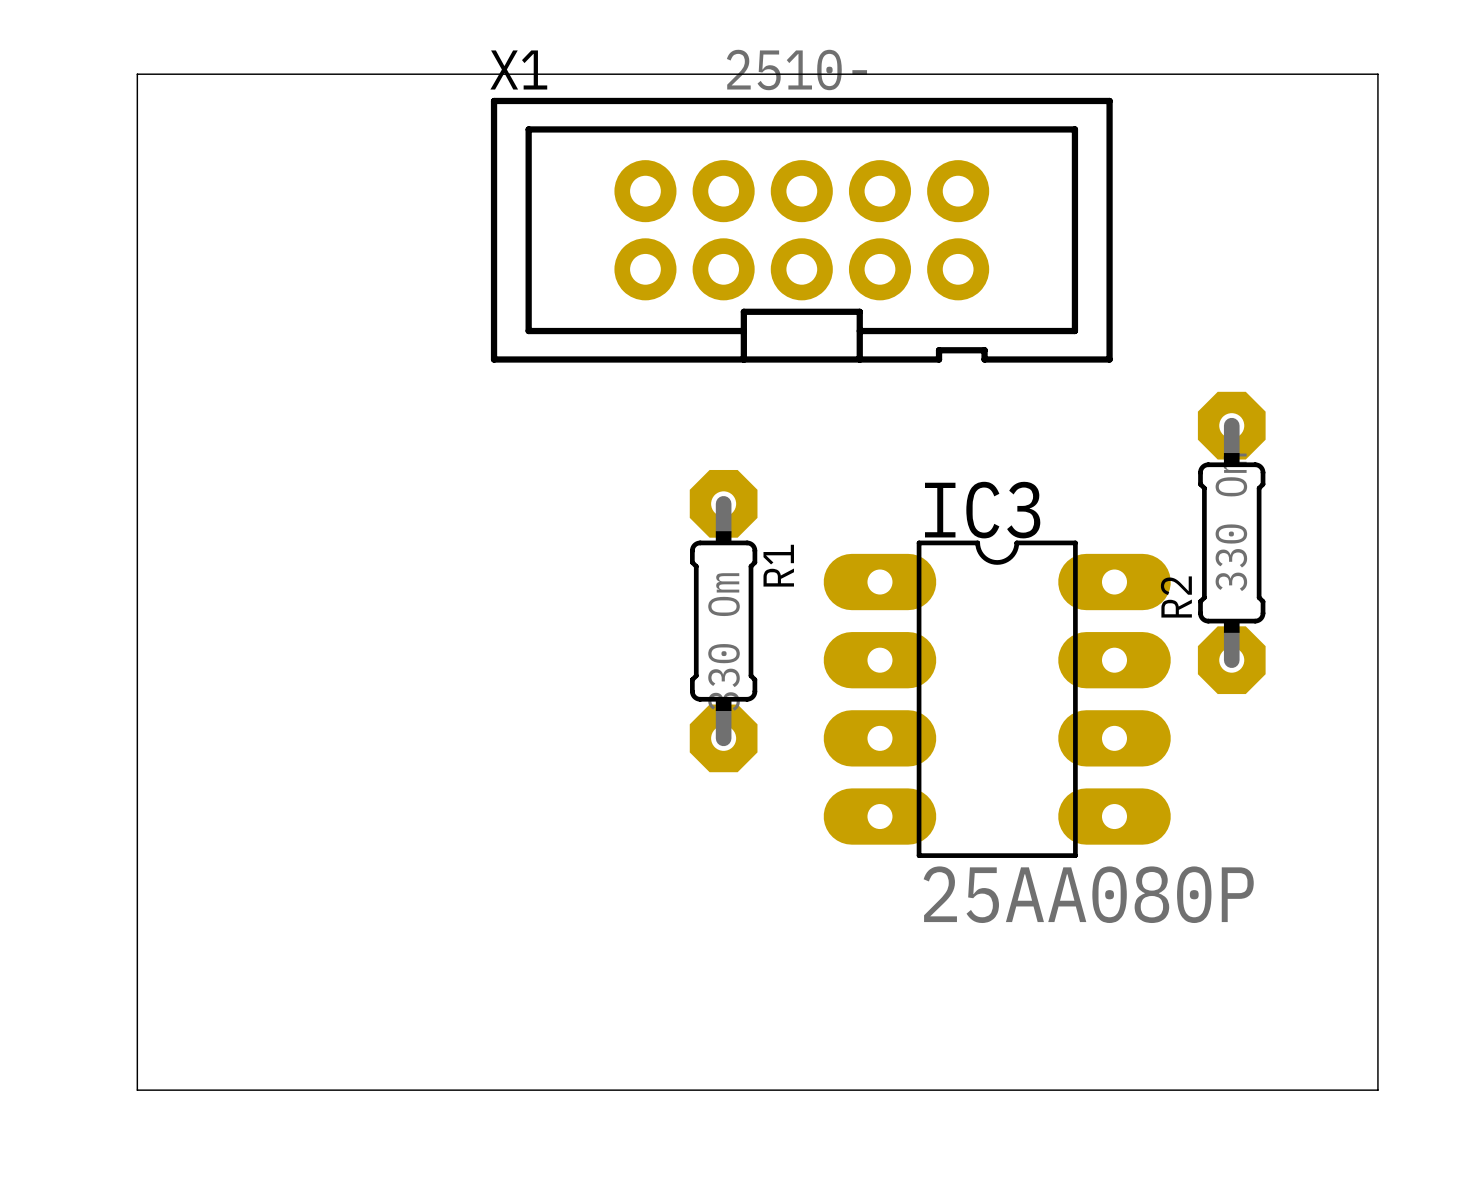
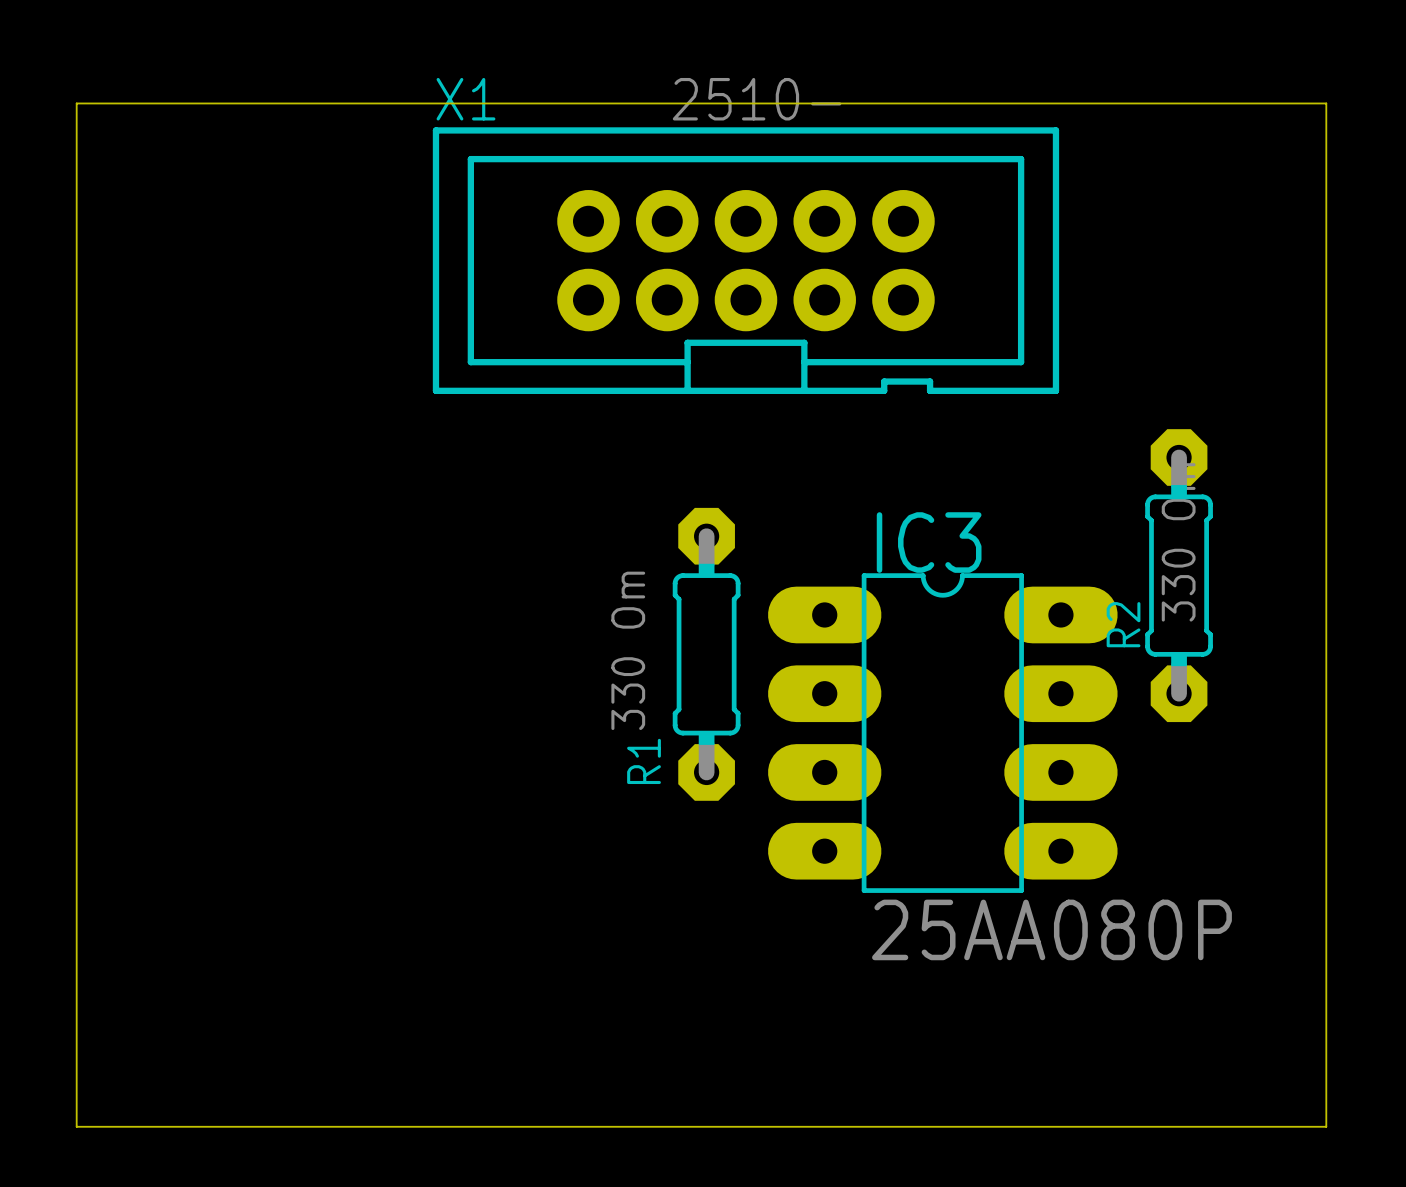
R2 footprint: [1197, 391, 1266, 695] -> [1145, 429, 1213, 723]
R1 footprint: [689, 469, 758, 773] -> [672, 507, 741, 801]
R1 name position: R1 (778, 565) -> R1 (644, 761)
R1 value position: 330 Om (724, 641) -> 330 Om (628, 650)

